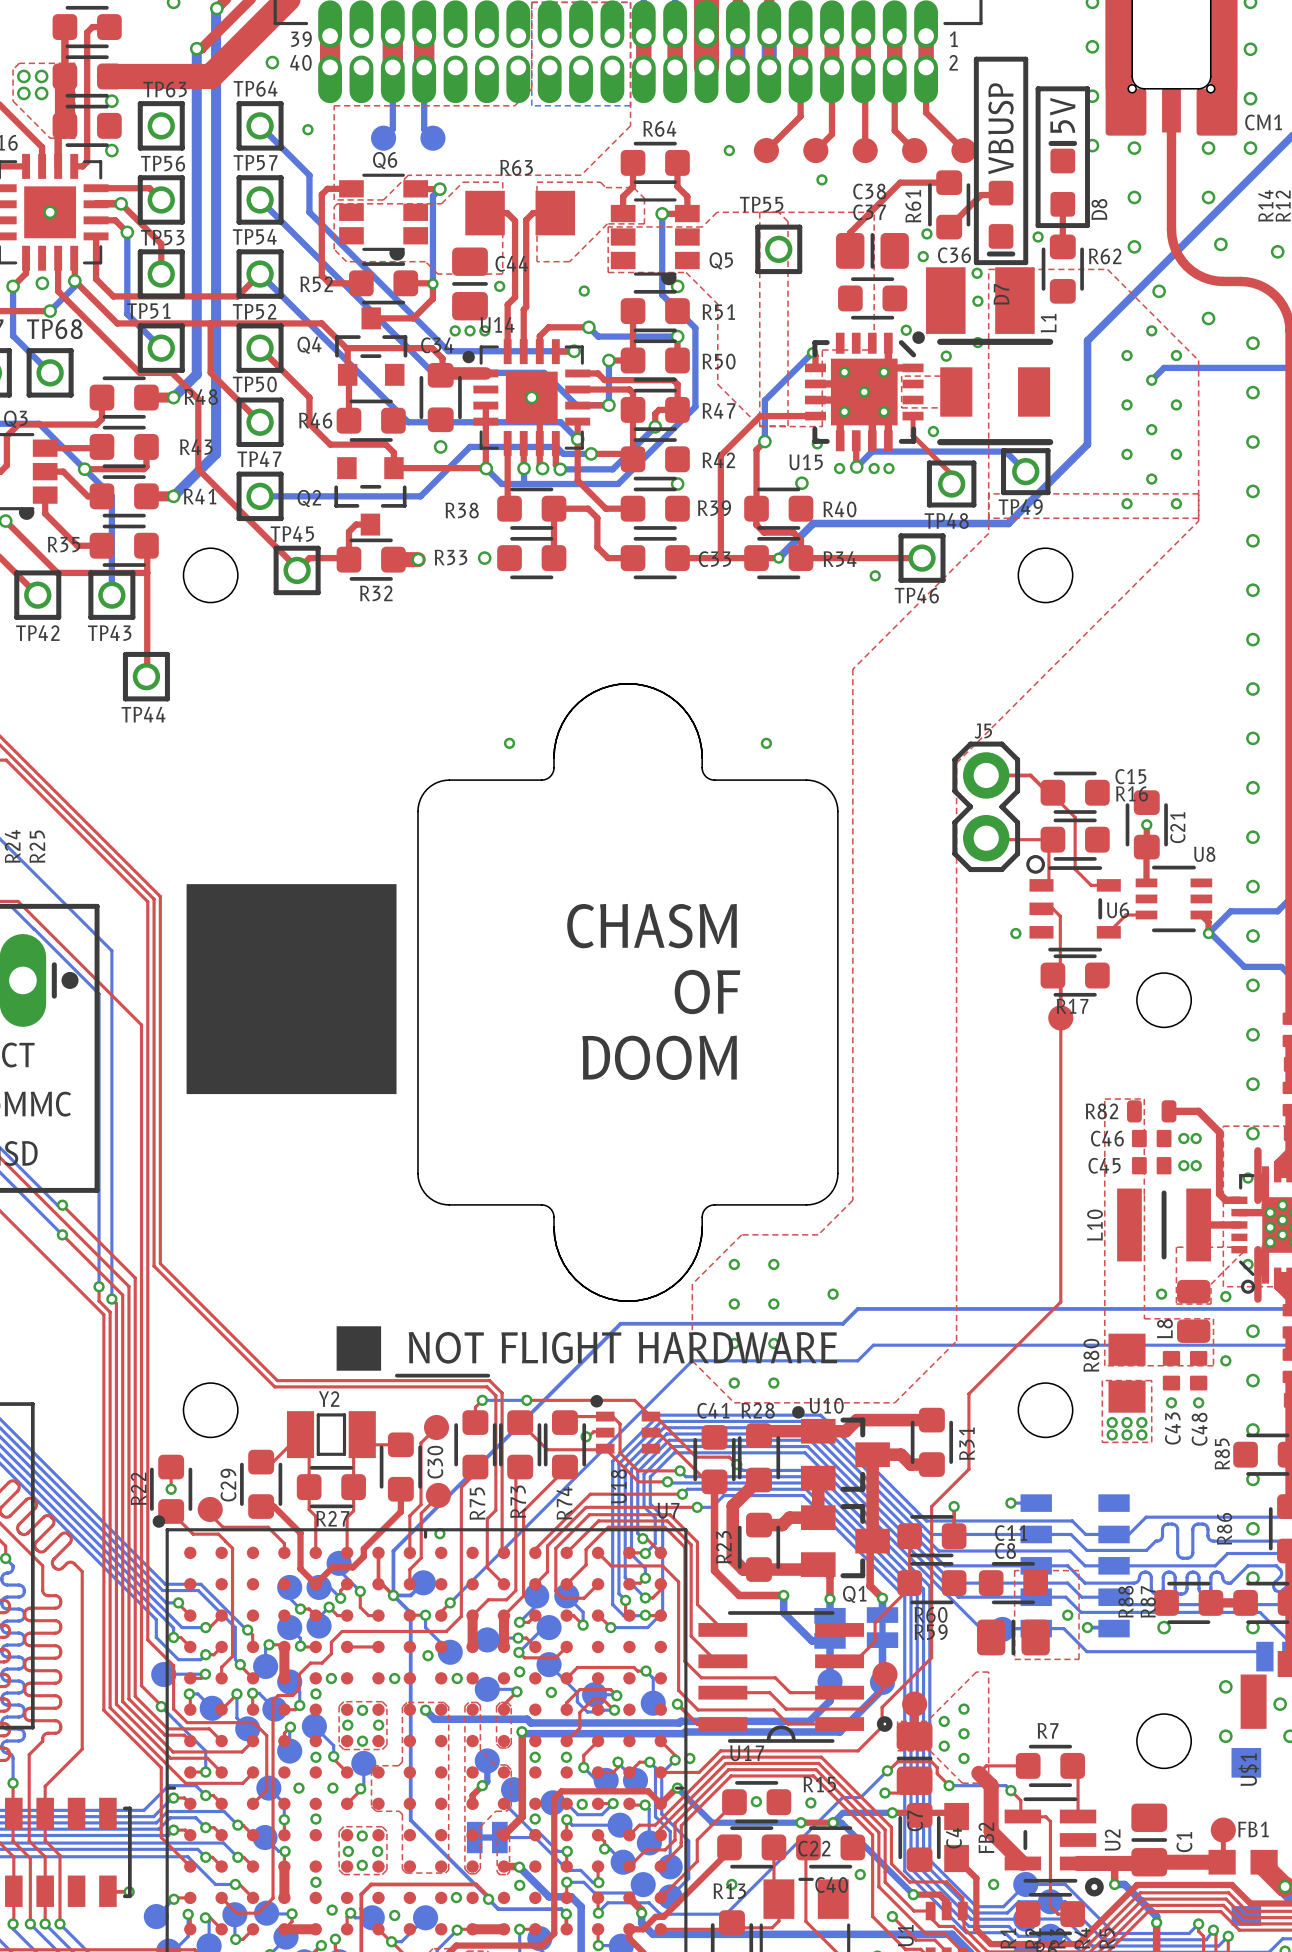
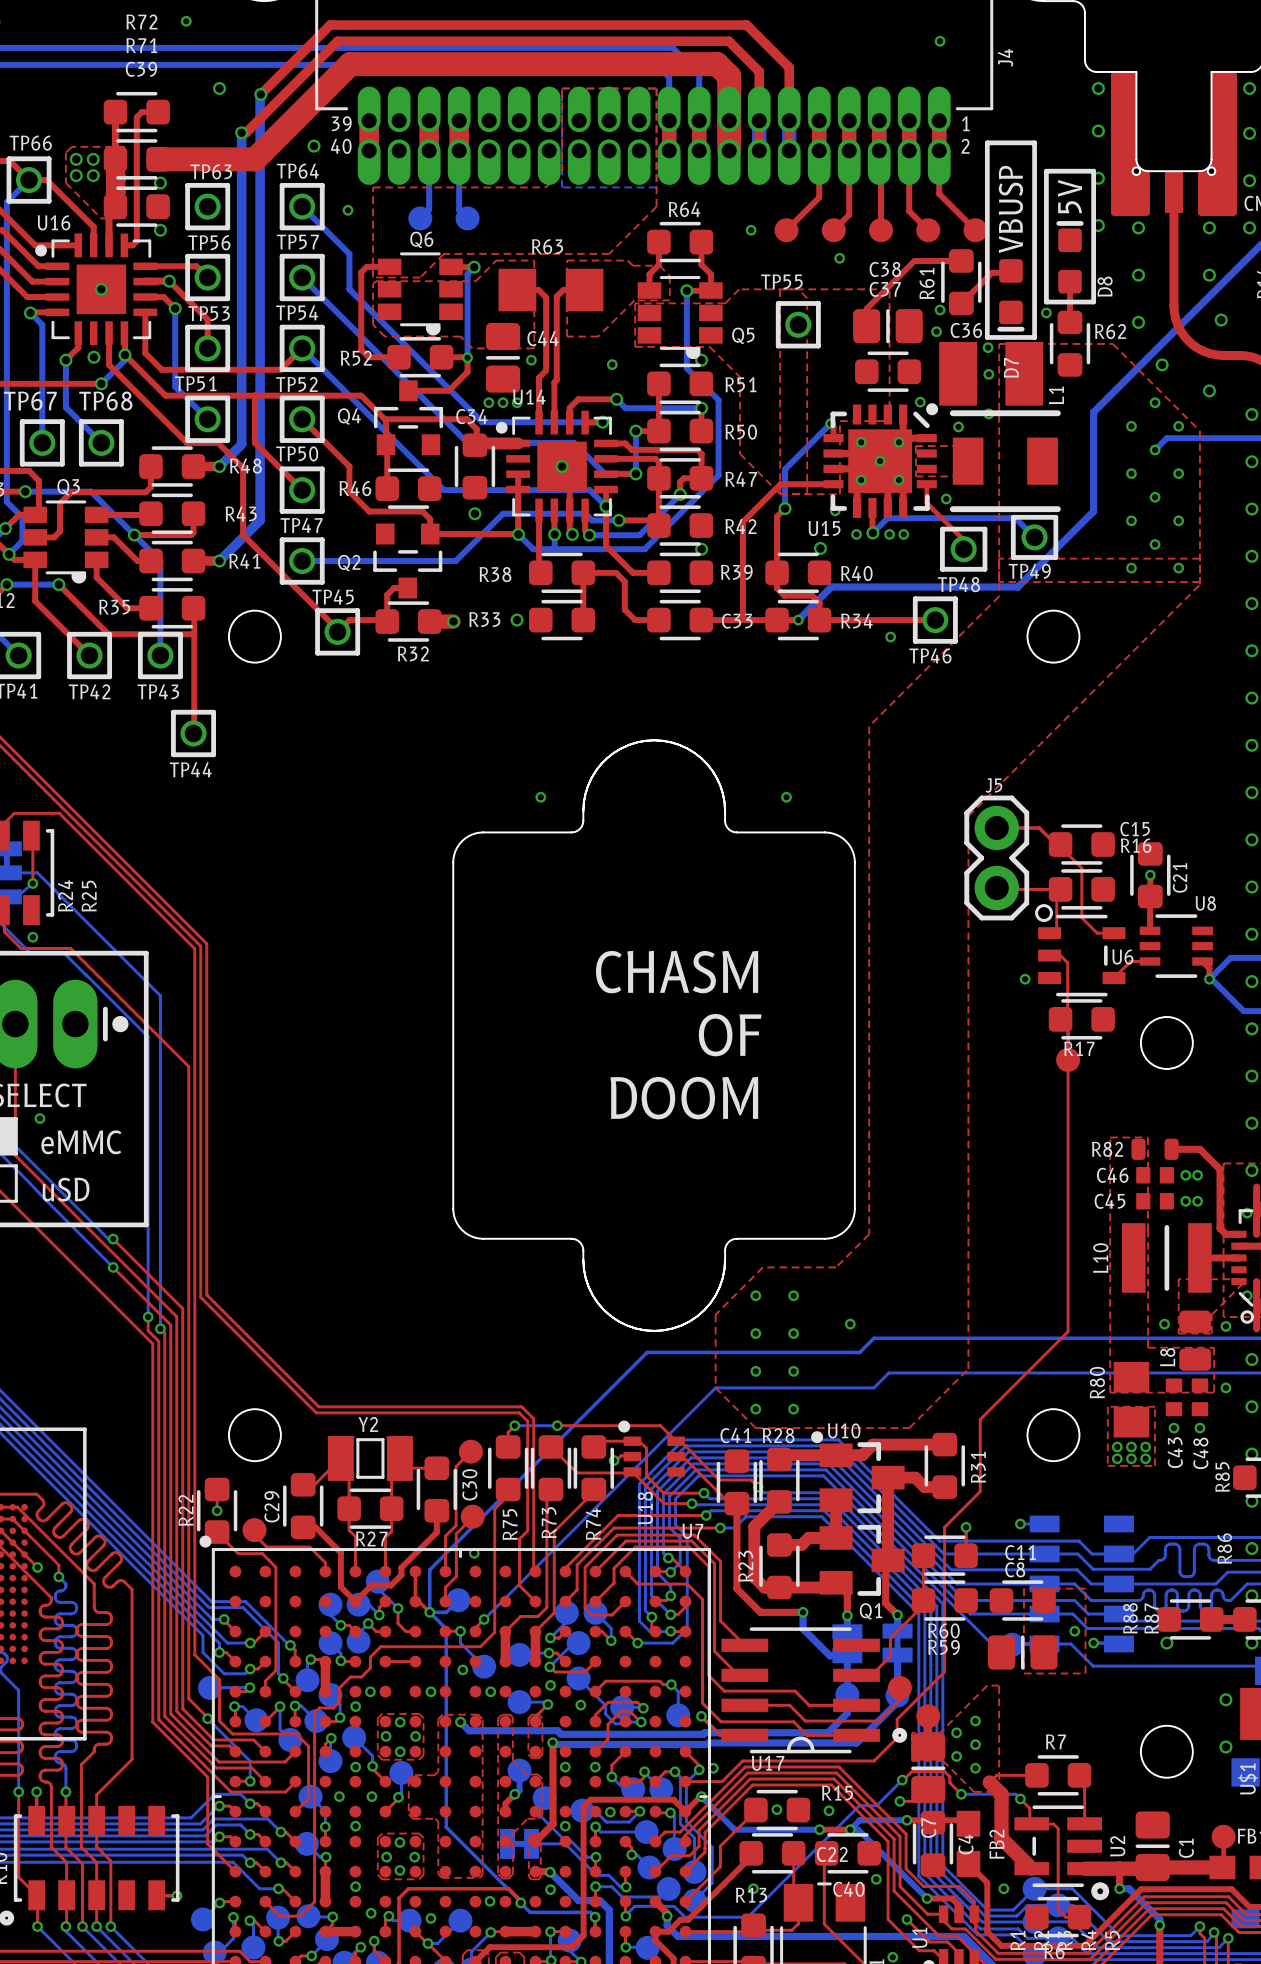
drawing: [186, 884, 397, 1095] -> none
drawing: [336, 1326, 491, 1378] -> none

